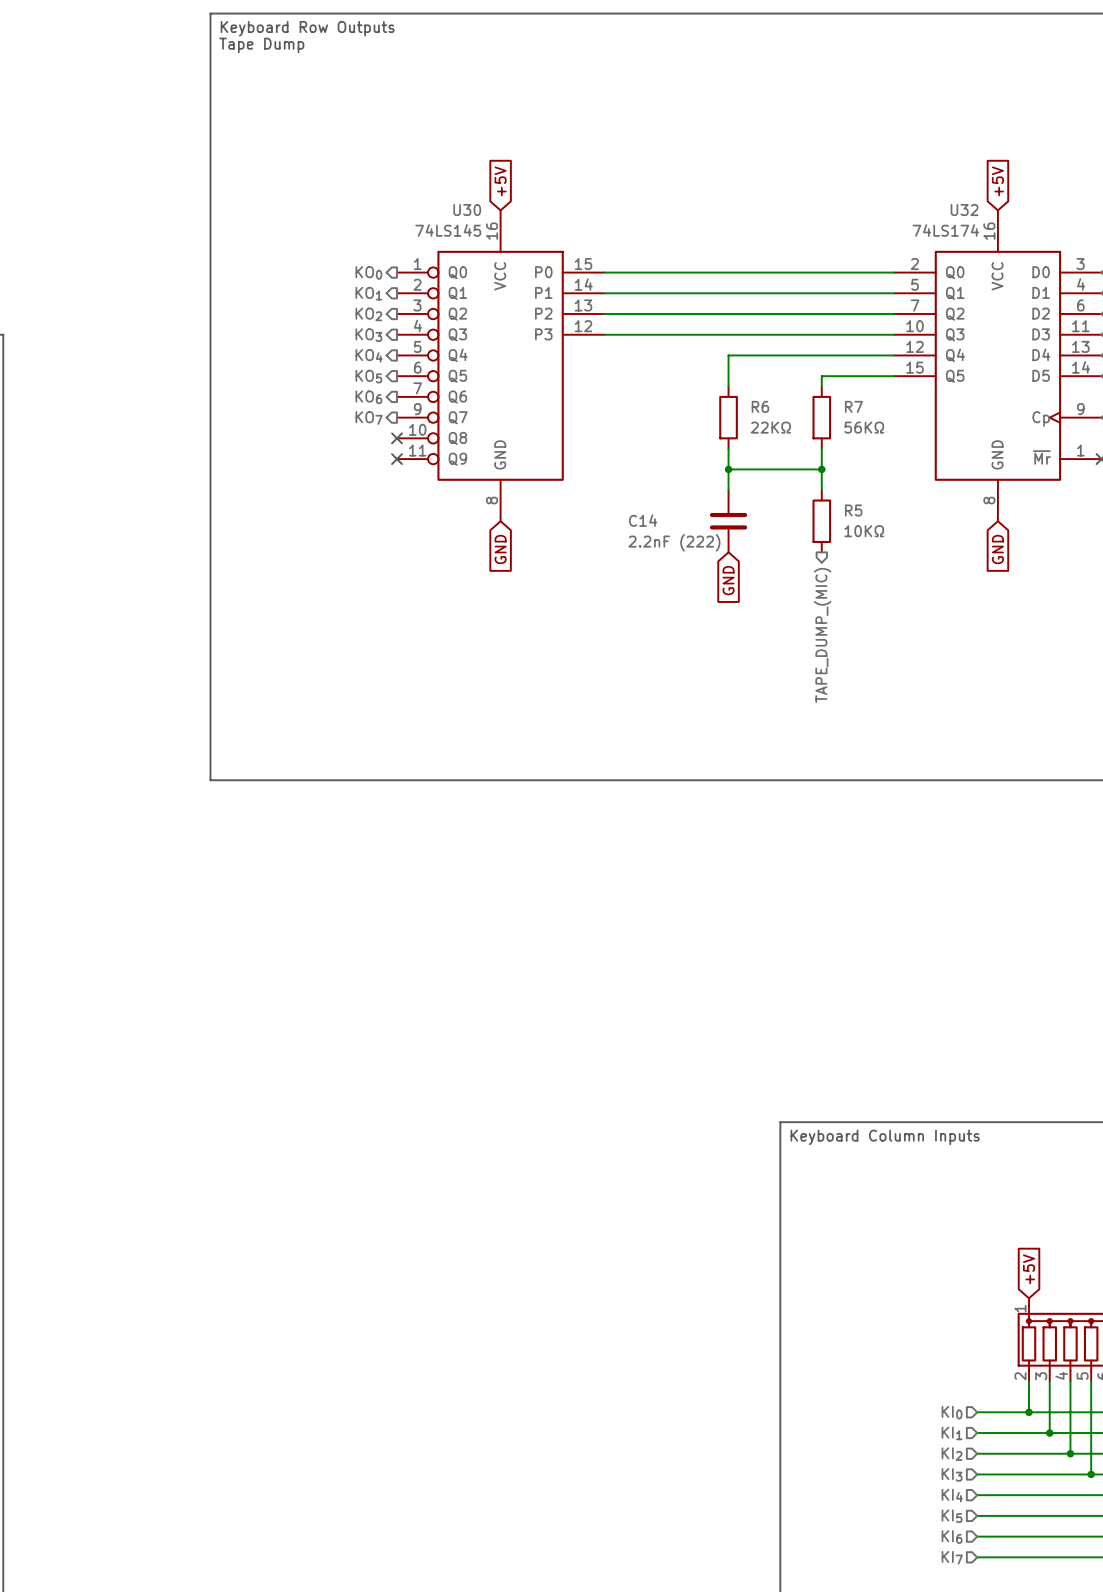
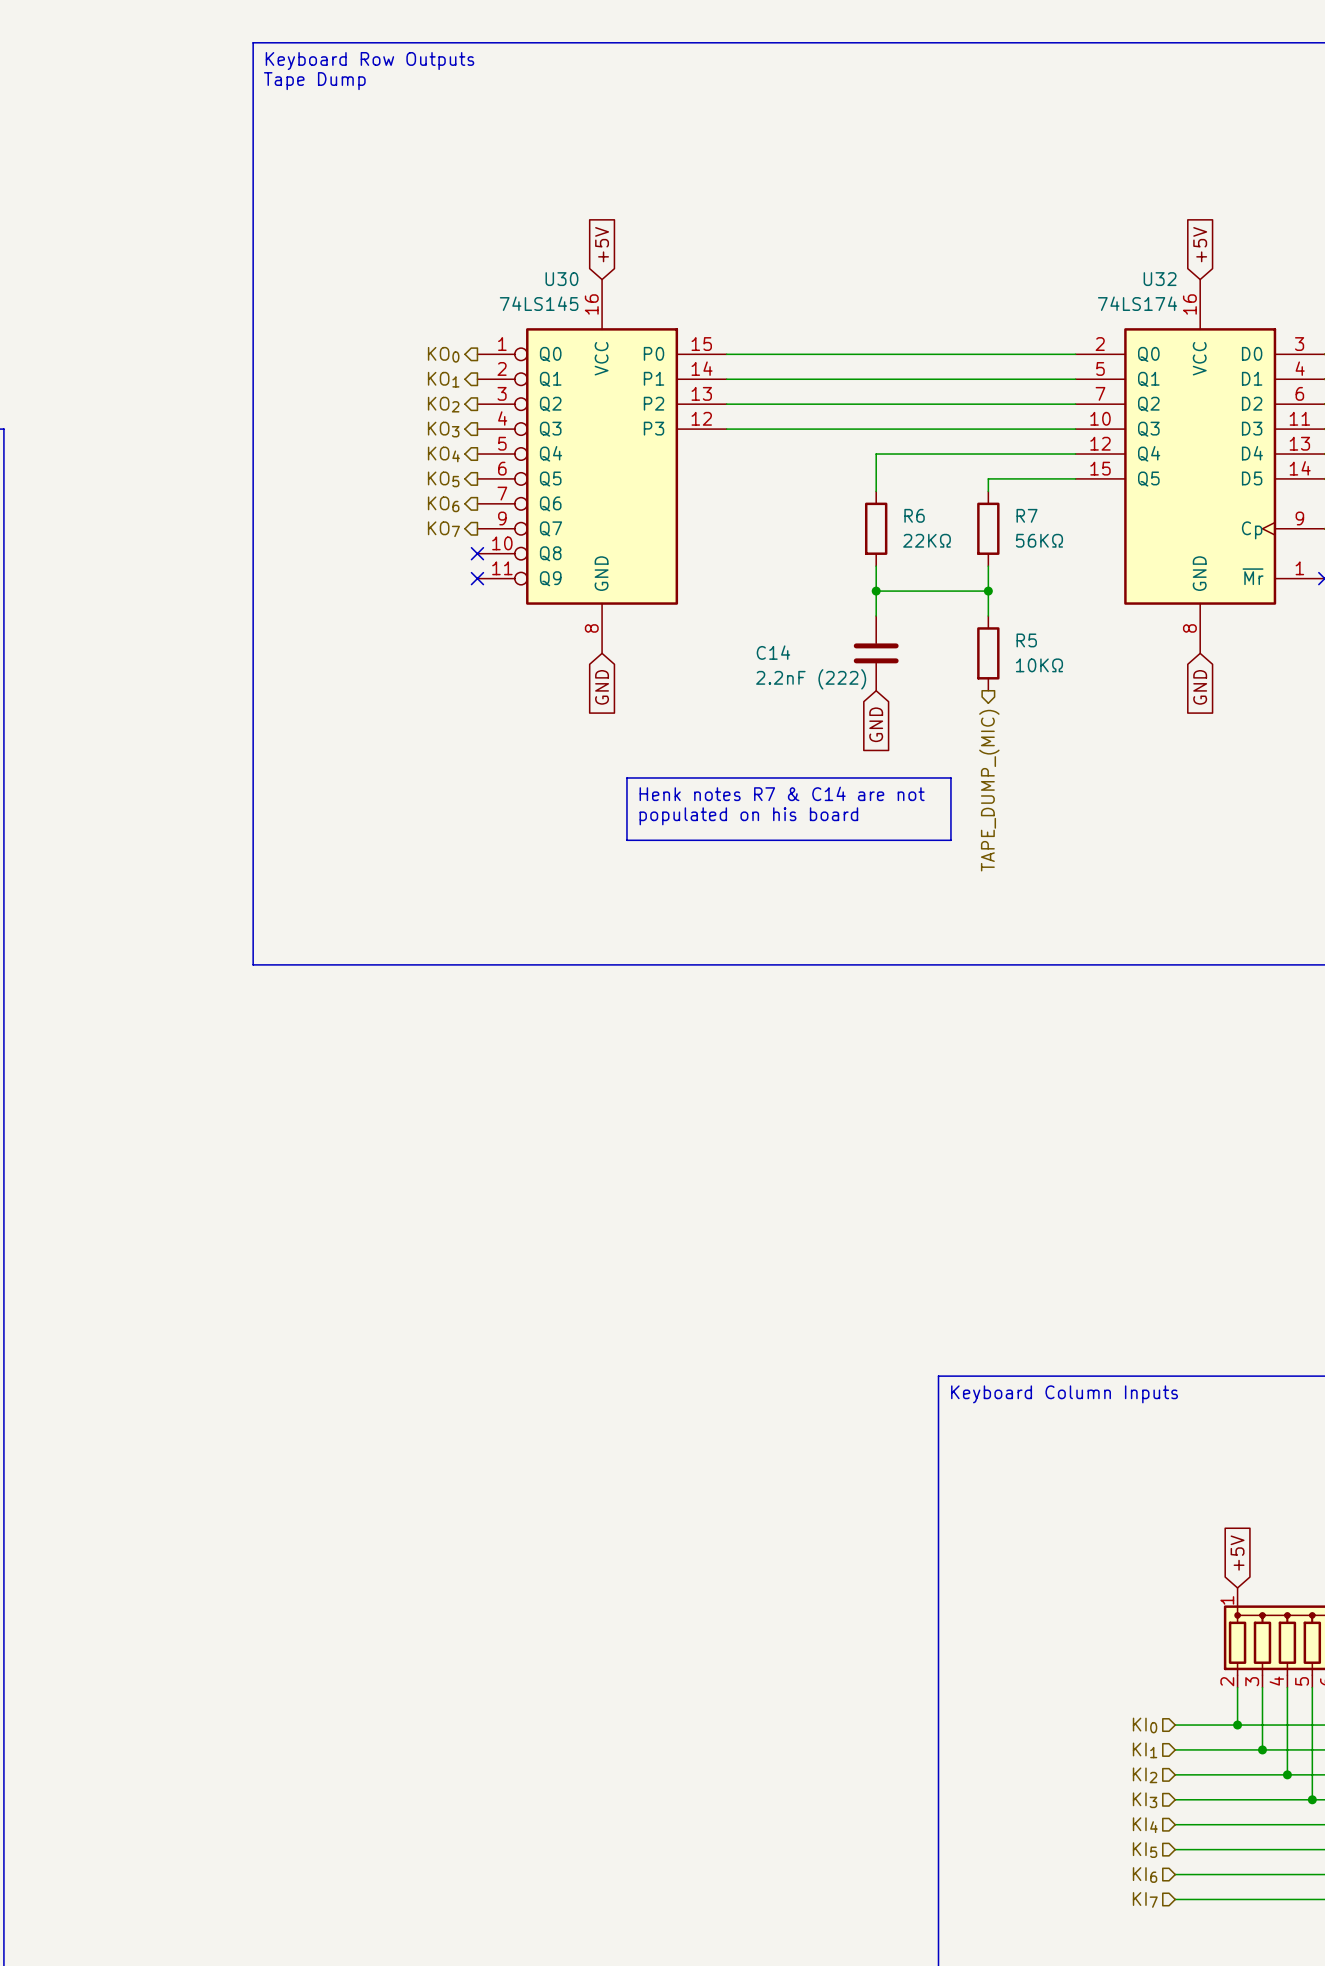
line: none -> (626, 777) (950, 777) (950, 840) (626, 840) (626, 777)
text: none -> Henk notes R7 & C14 are not (782, 793)
text: none -> populated on his board (748, 816)

